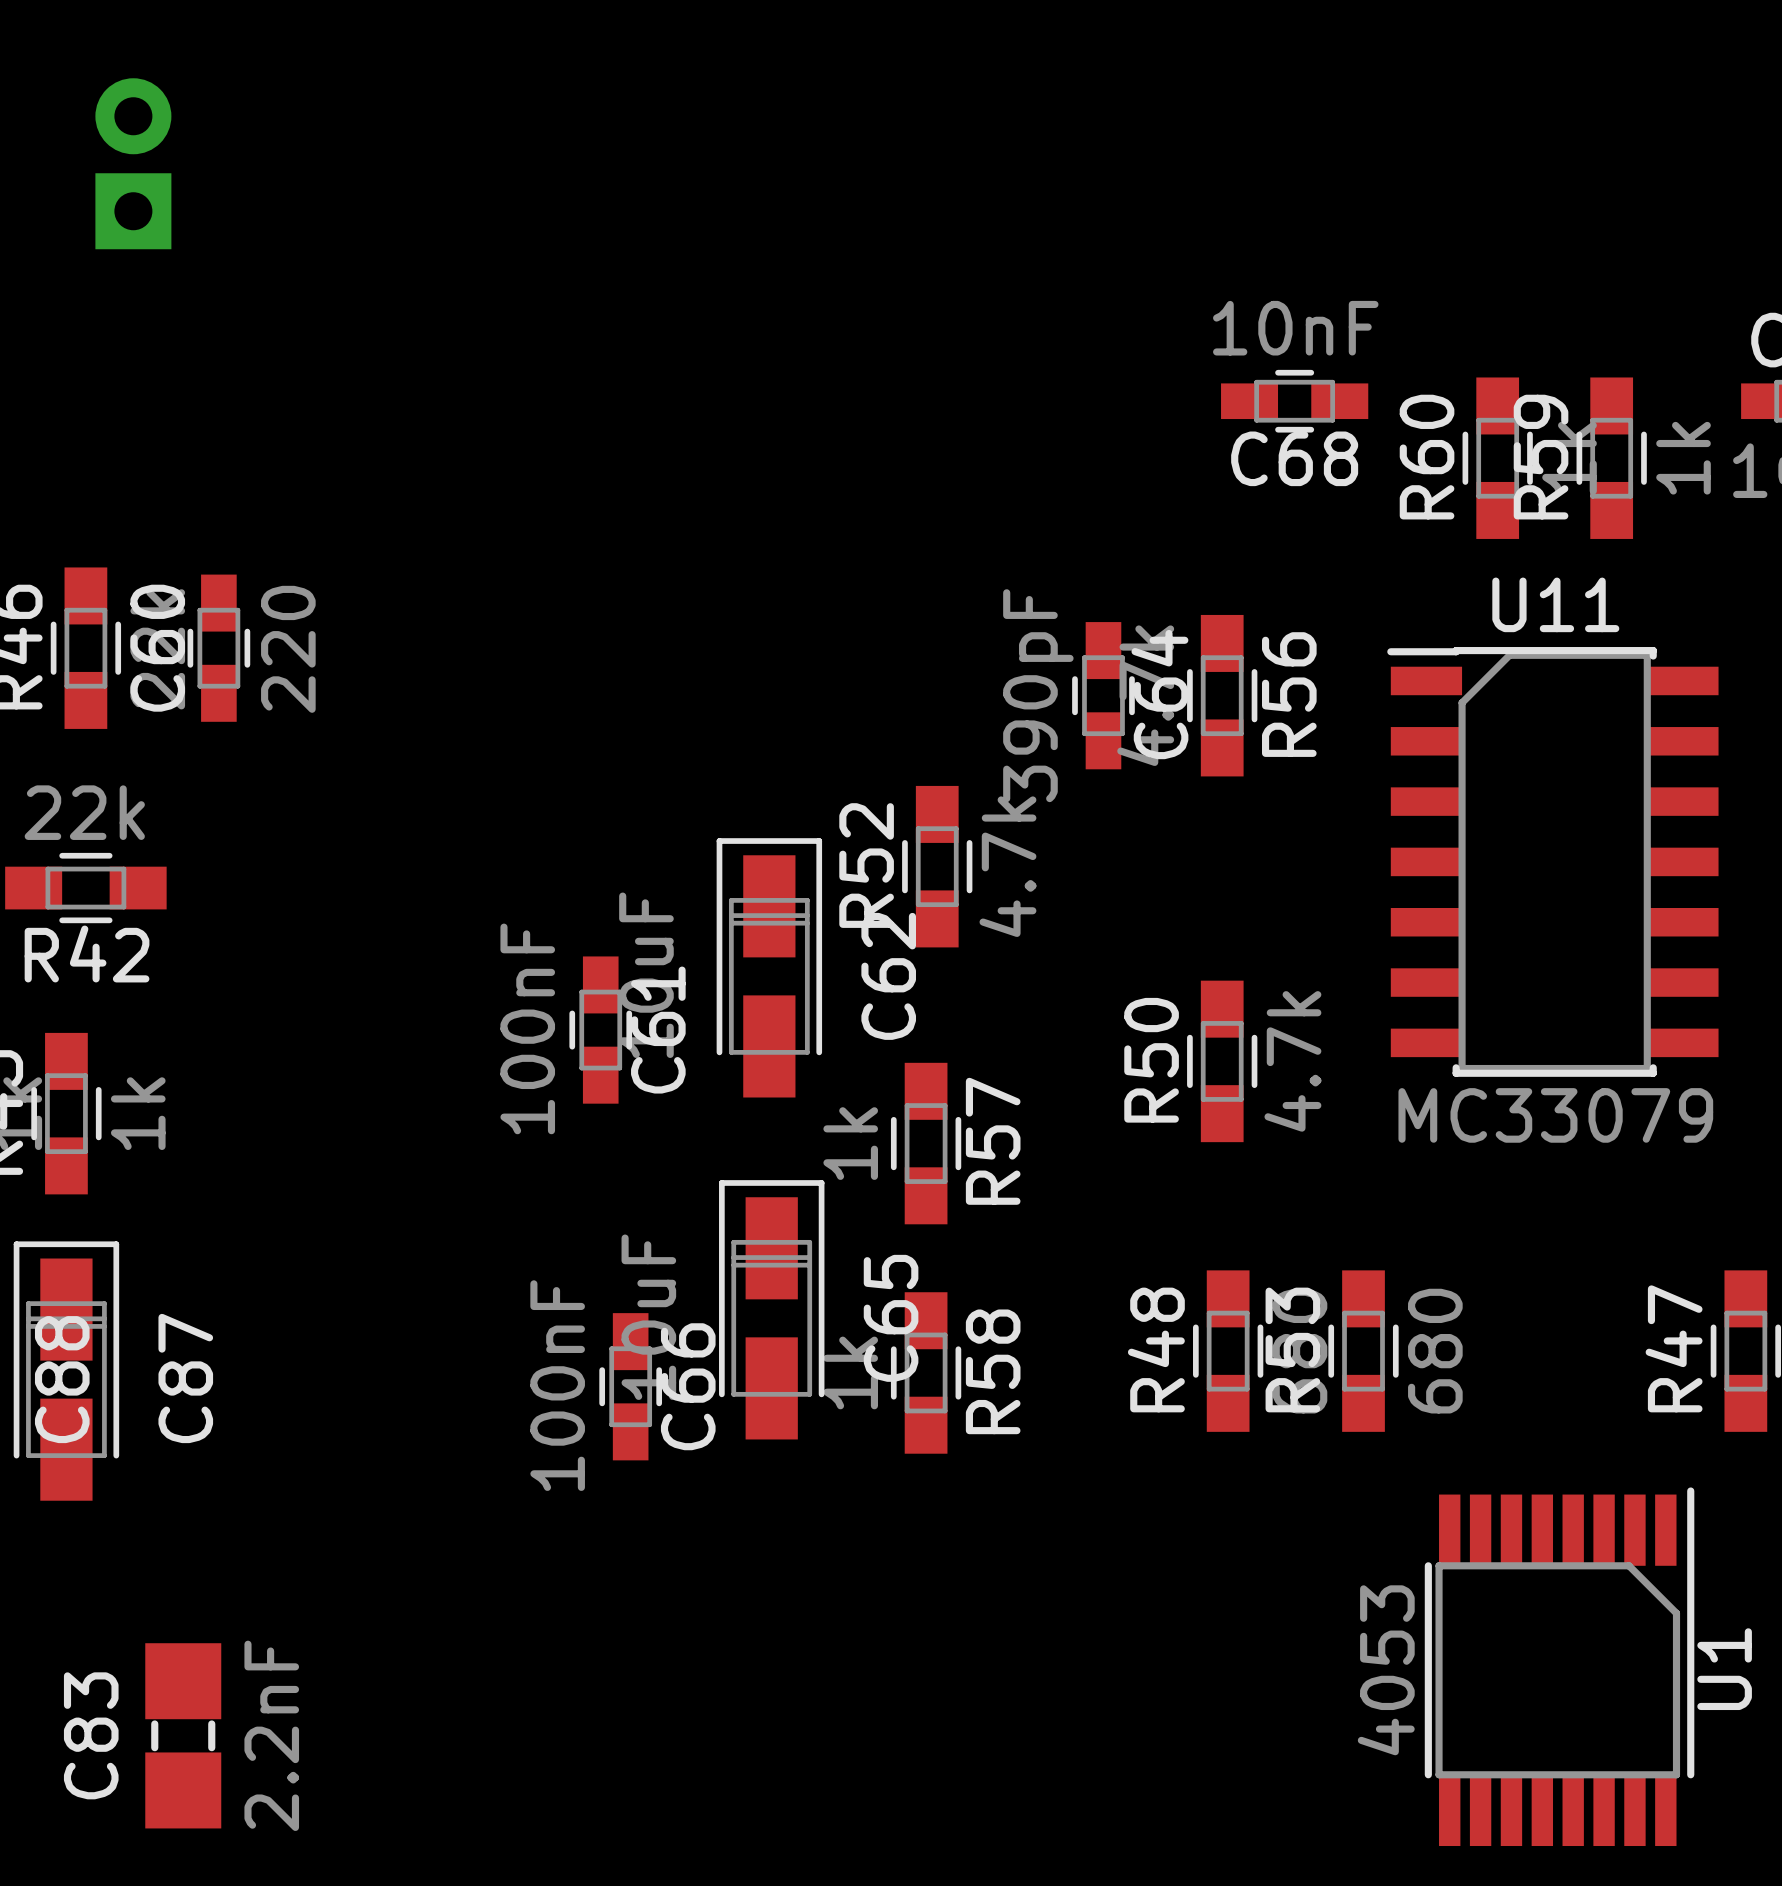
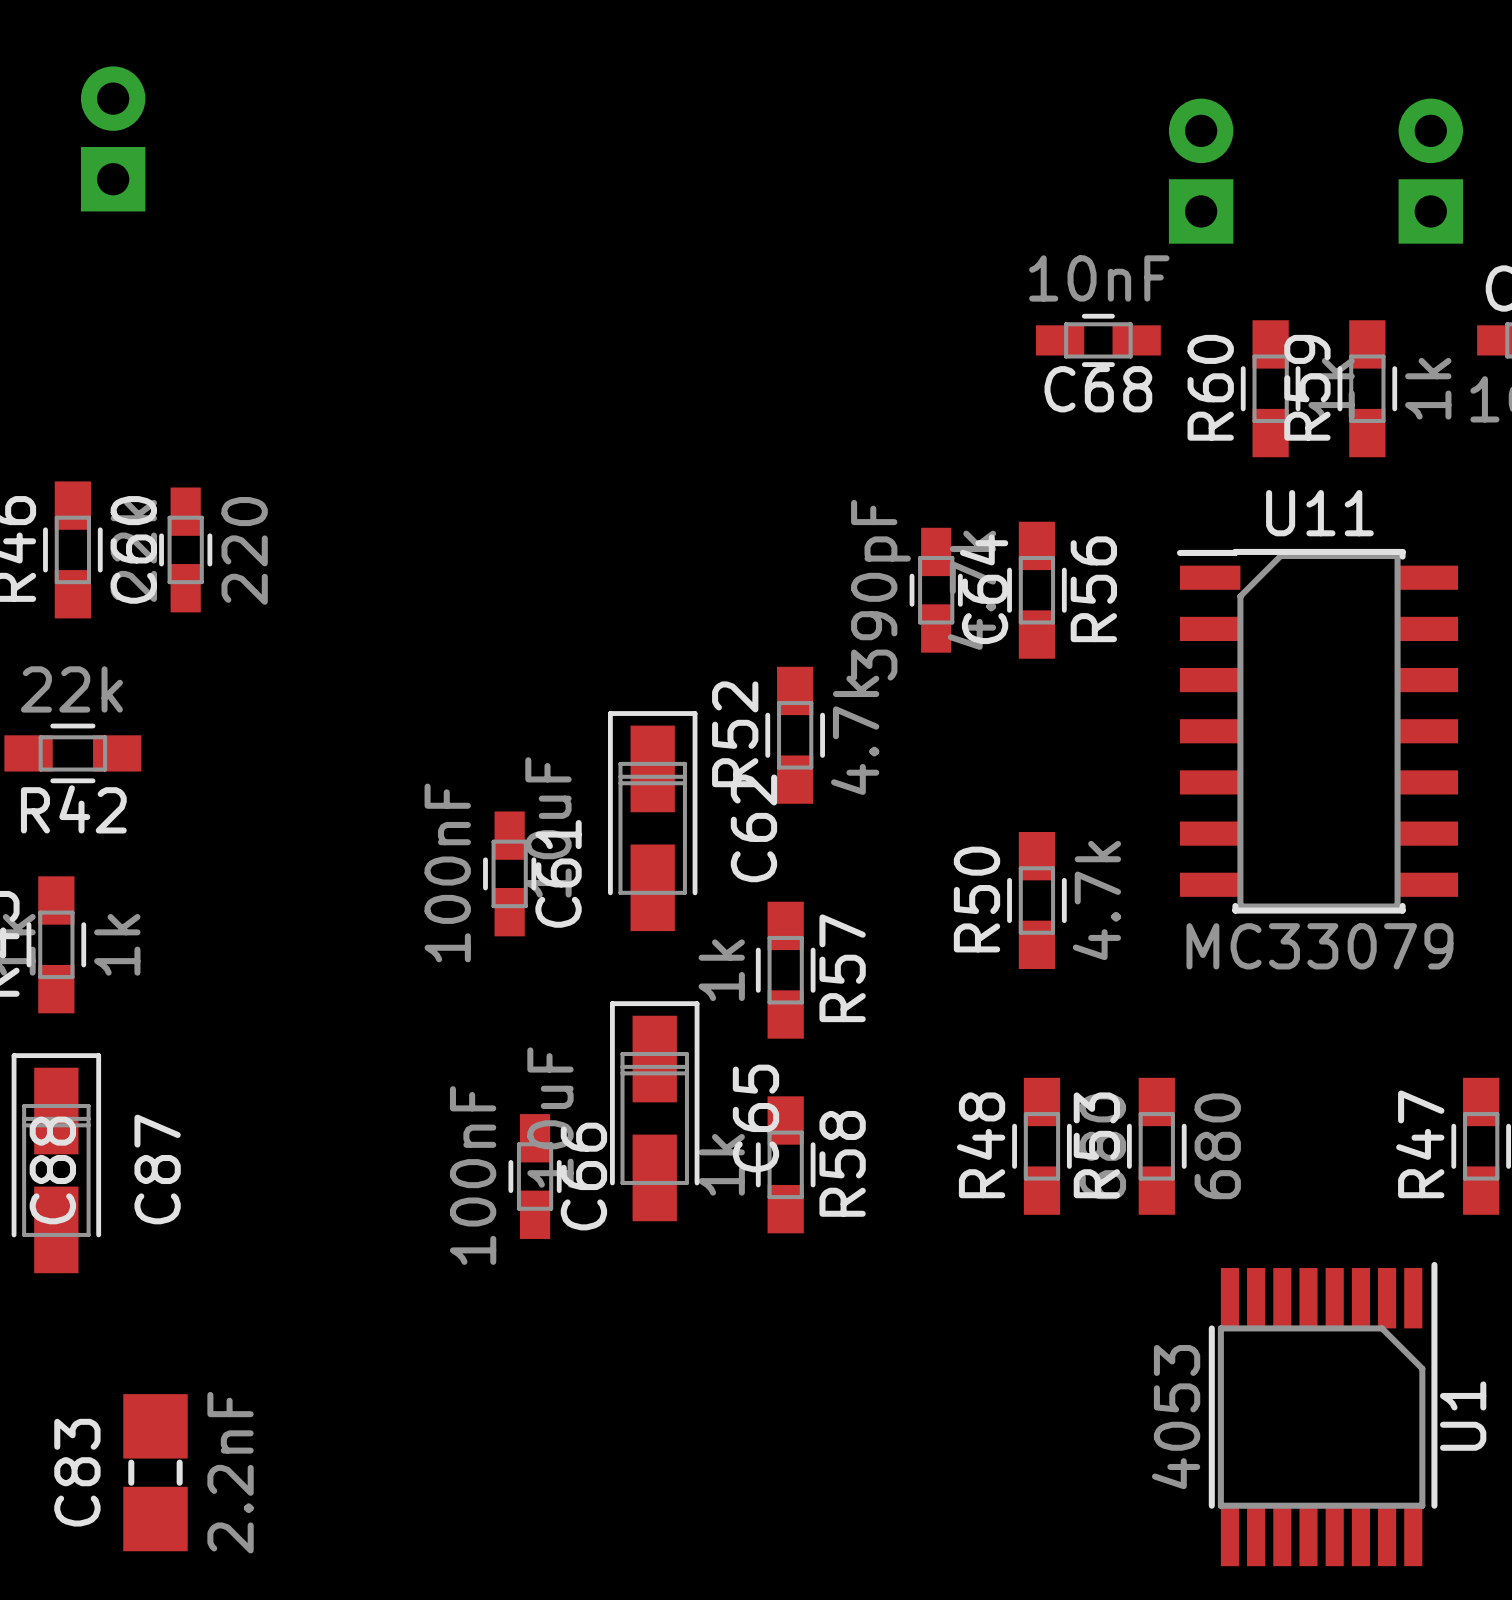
part: none -> (1201, 171)
part: none -> (1430, 171)

